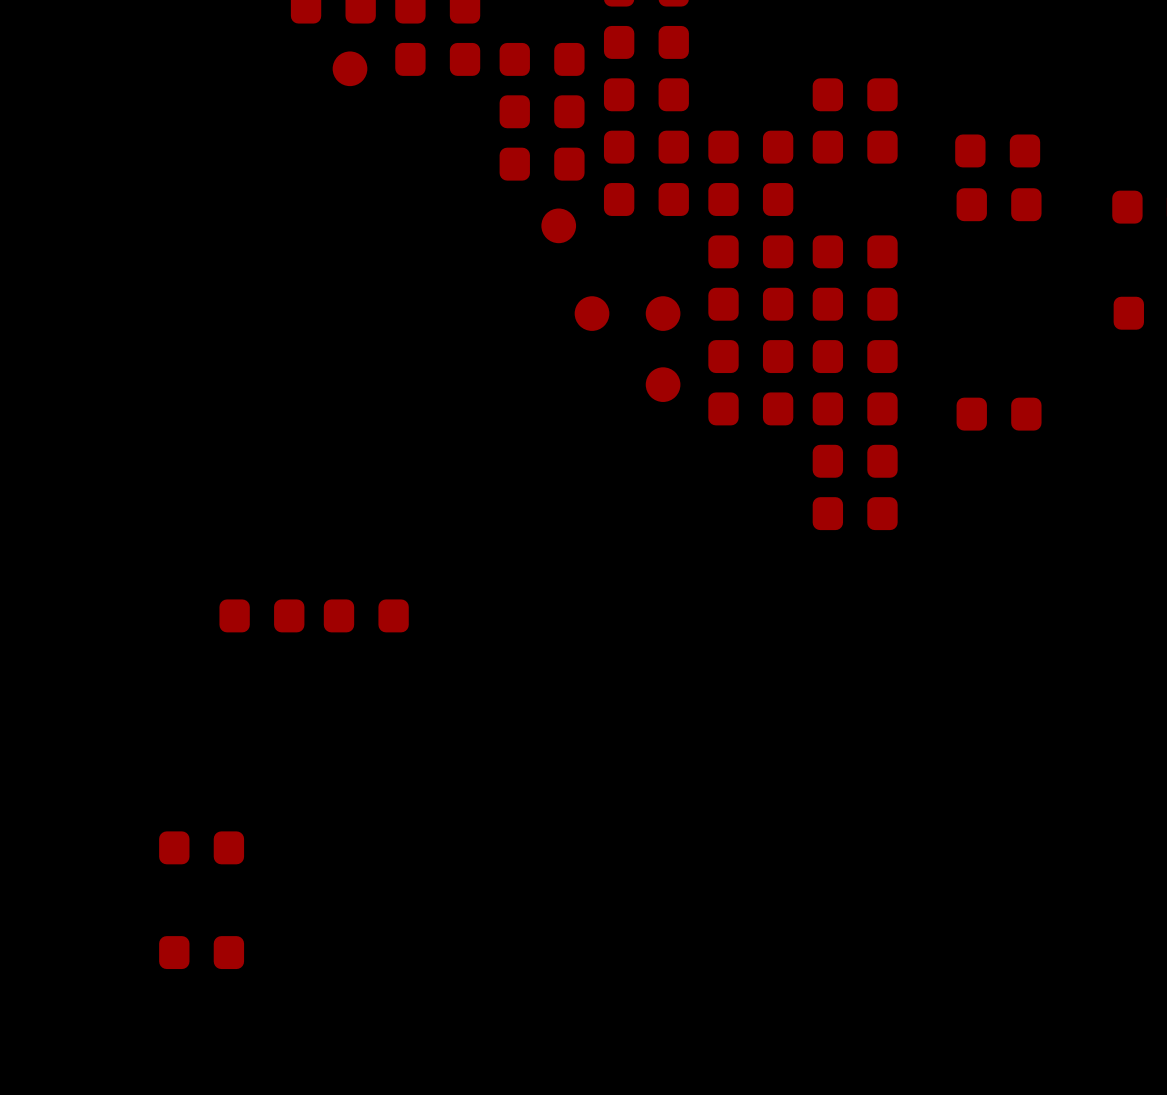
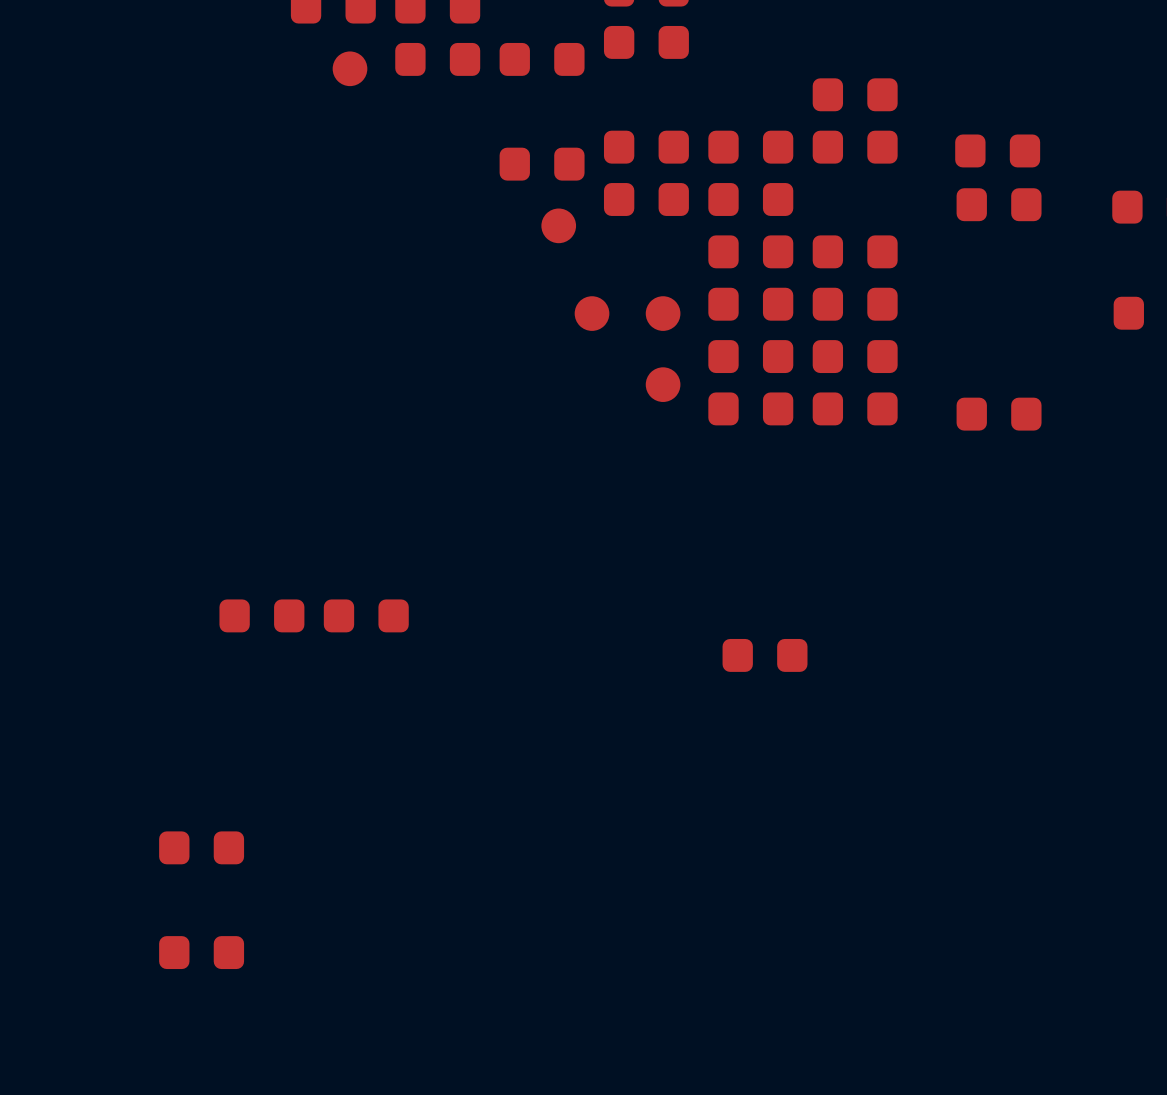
part: (646, 94) -> none
part: (542, 111) -> none
part: (855, 461) -> none
part: (855, 513) -> none
part: none -> (765, 655)

